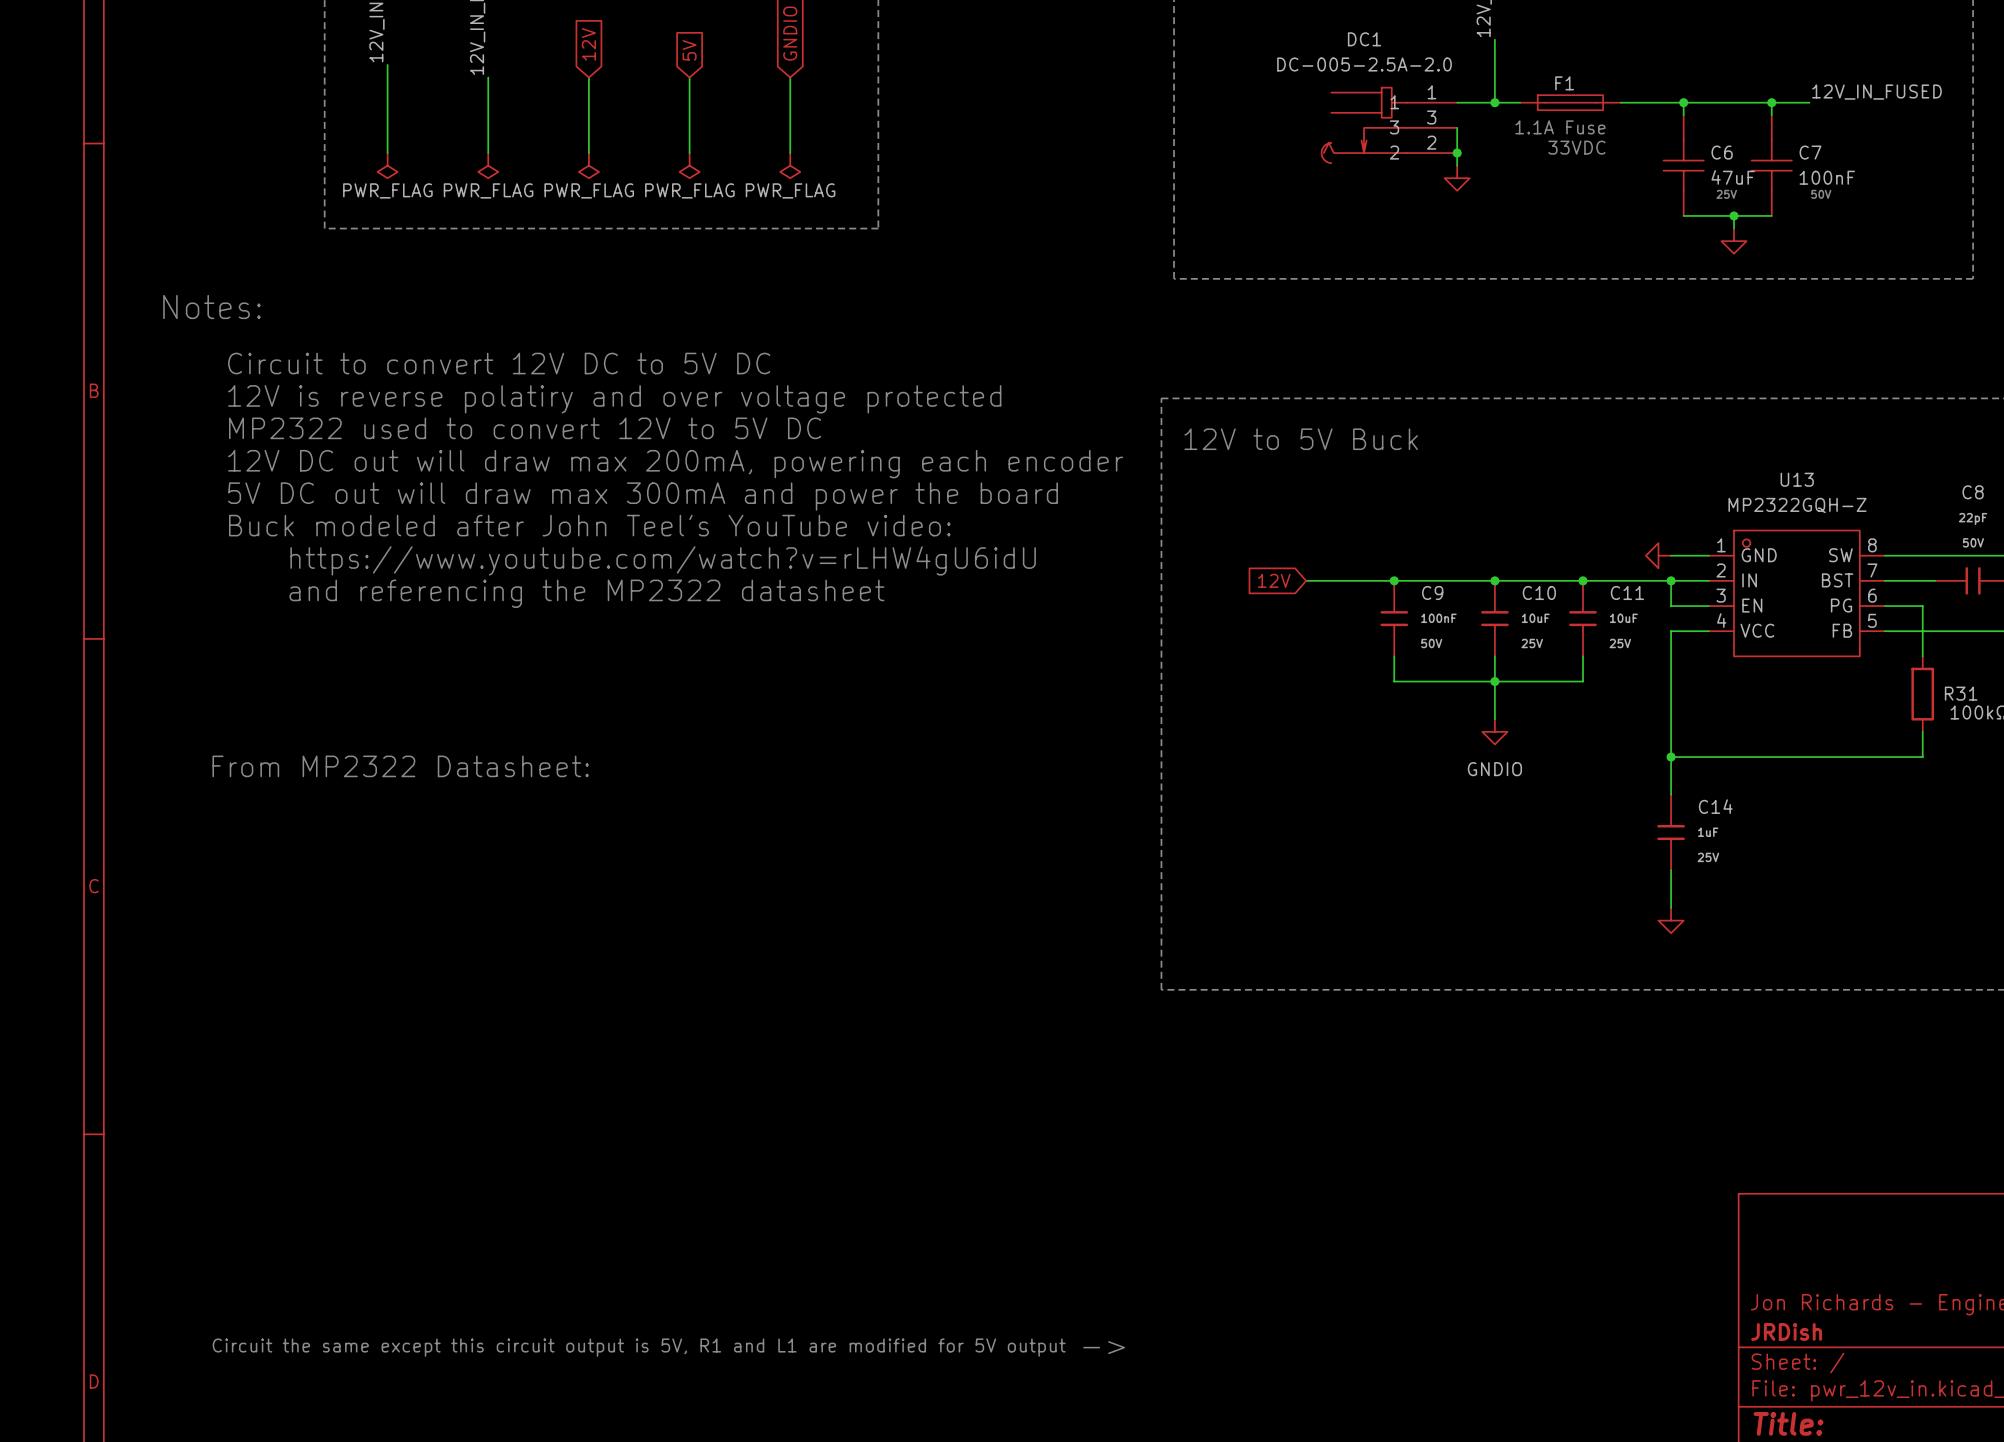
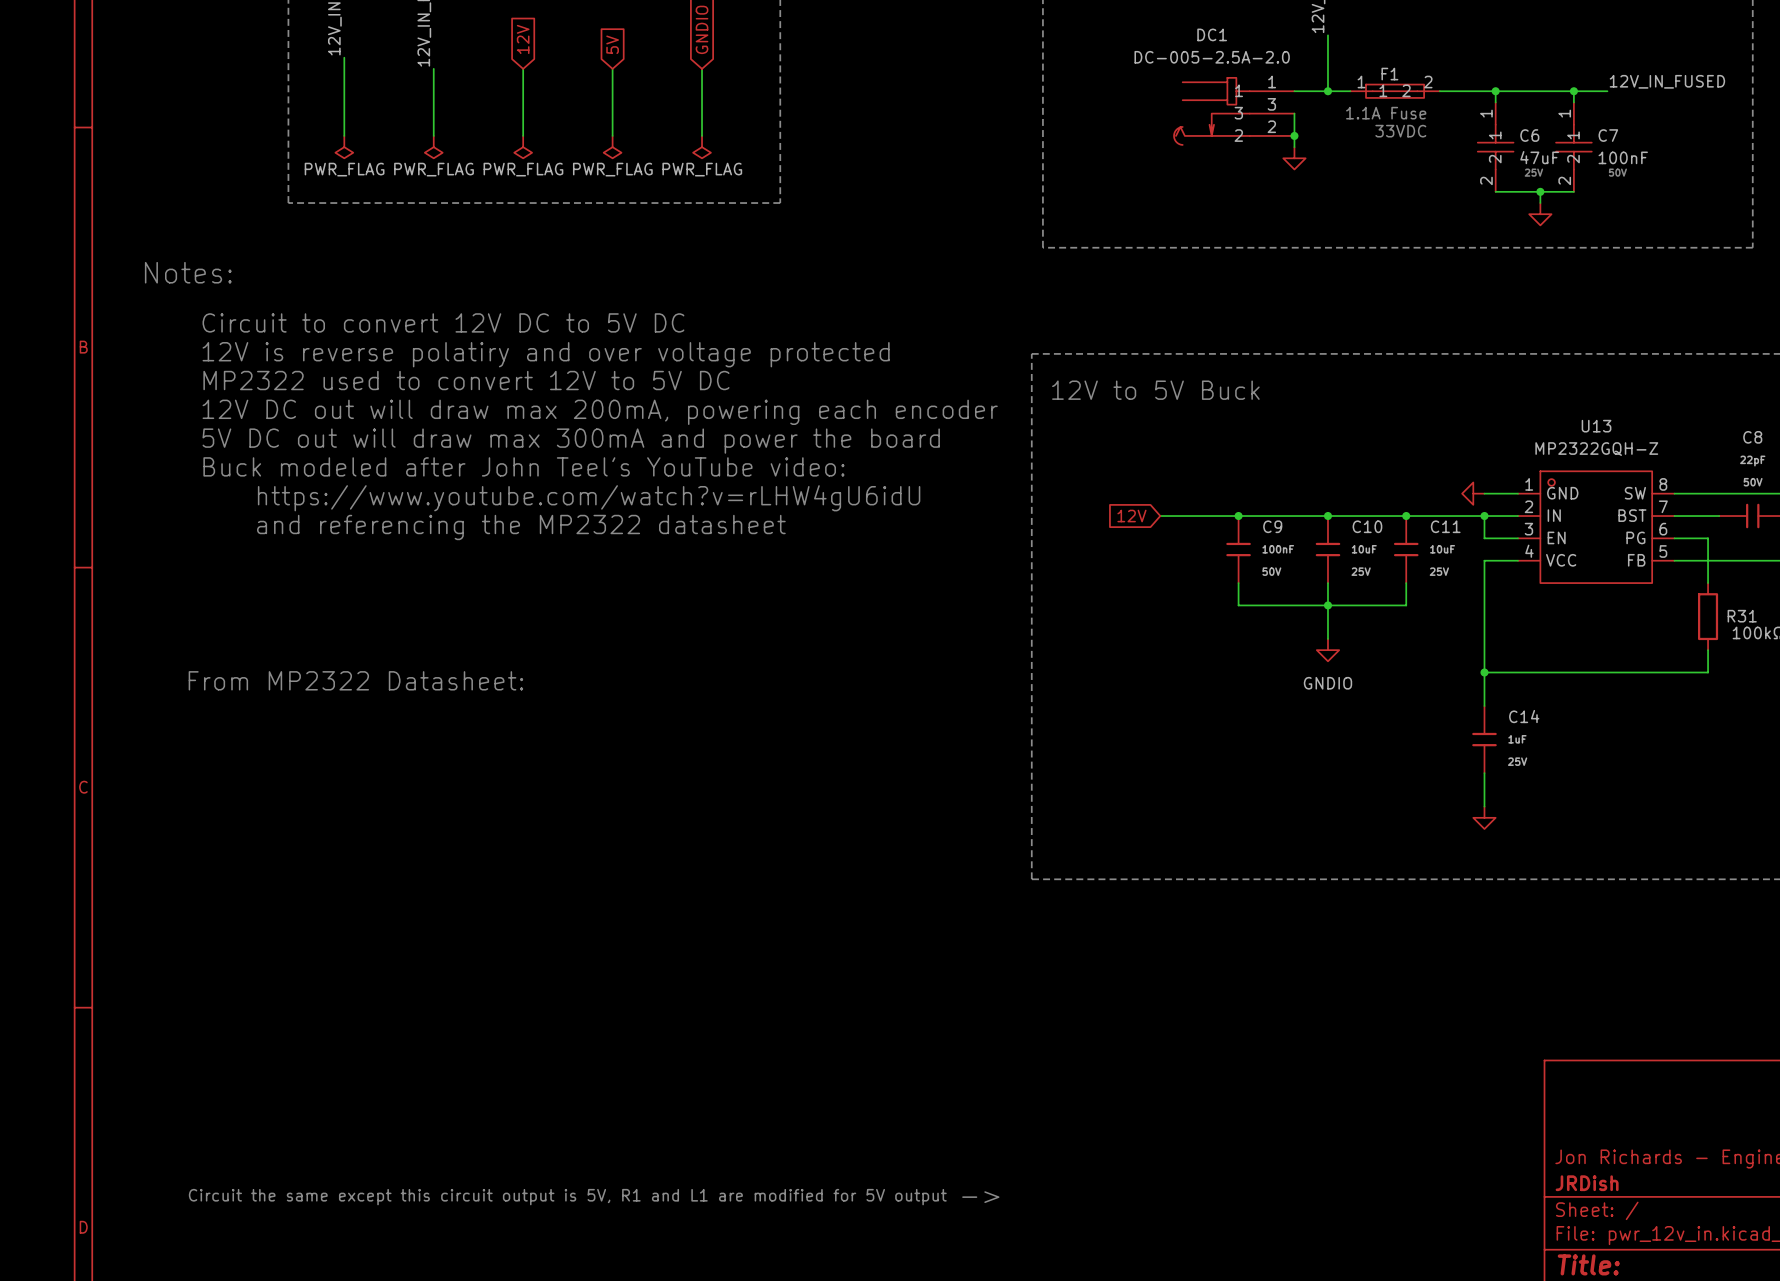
F1 pin number: none -> 1 (1361, 82)
F1 pin number: none -> 2 (1428, 82)
F1 pin name: none -> 1 (1383, 90)
F1 pin name: none -> 2 (1406, 90)
C6 pin number: none -> 1 (1486, 113)
C7 pin number: none -> 1 (1564, 113)
C6 pin name: none -> 1 (1495, 135)
C7 pin name: none -> 1 (1573, 135)
C6 pin name: none -> 2 (1495, 159)
C7 pin name: none -> 2 (1573, 159)
C6 pin number: none -> 2 (1486, 180)
C7 pin number: none -> 2 (1564, 180)

